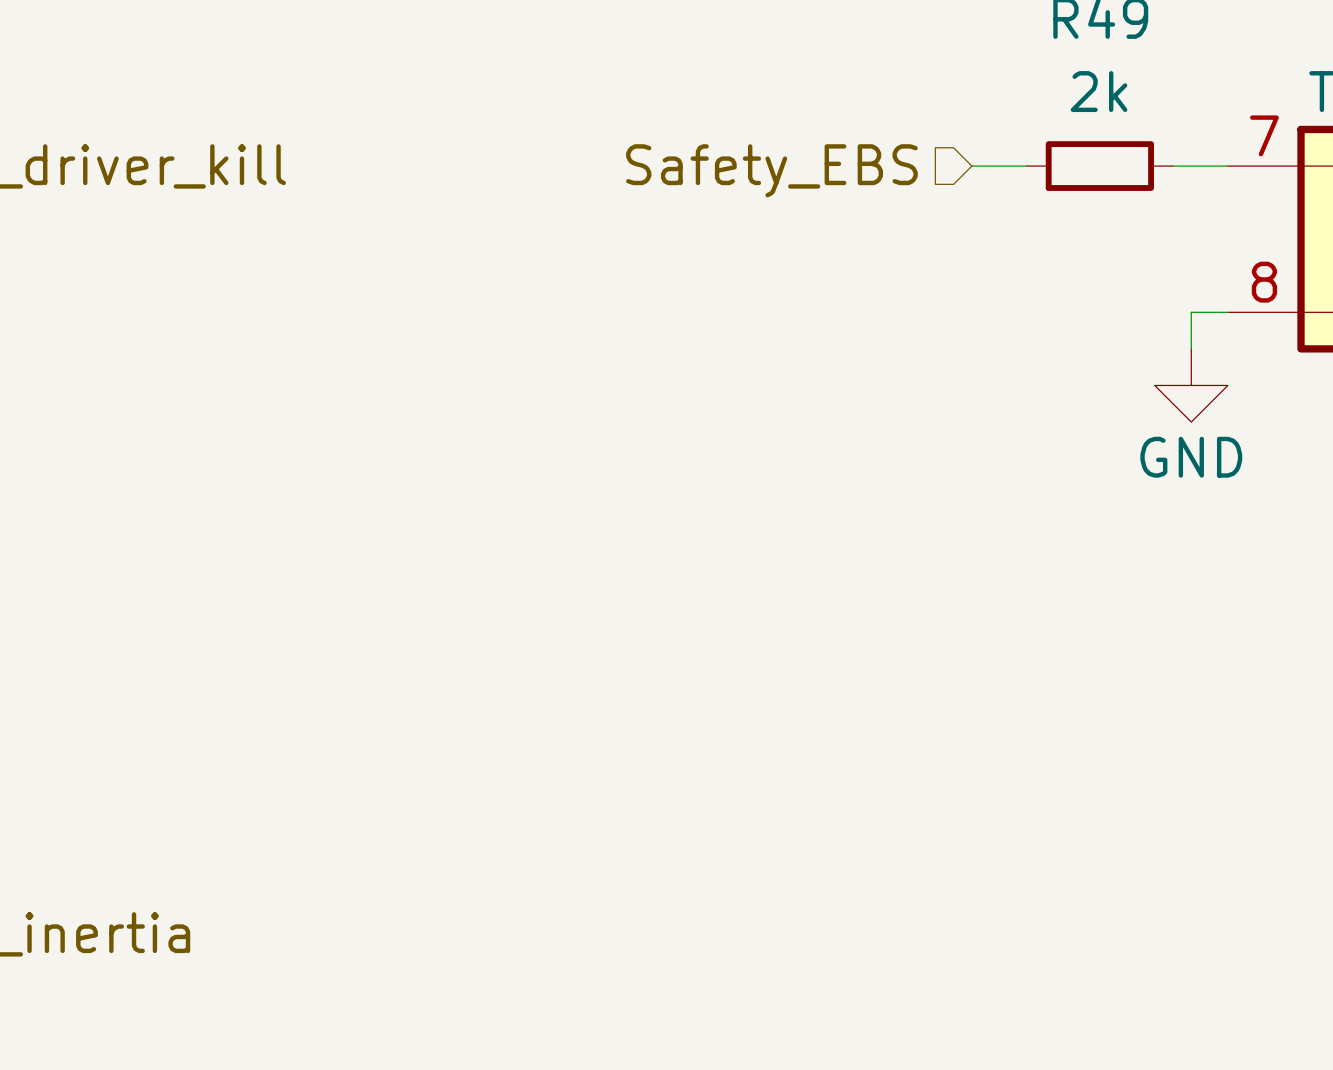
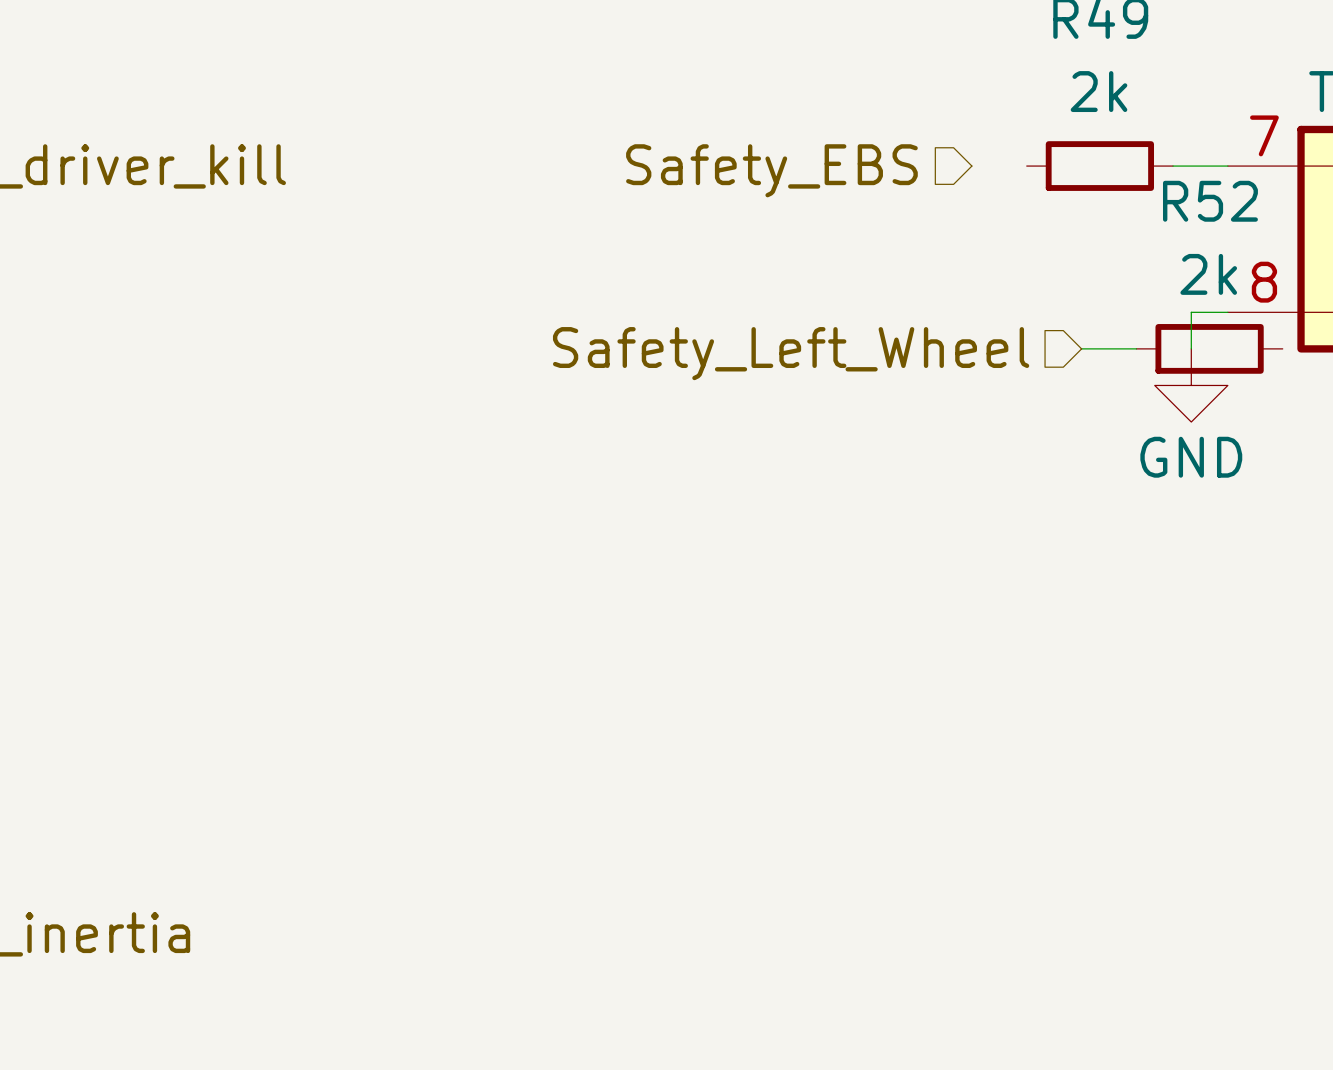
wire: (971, 166) (1026, 166) -> (1081, 348) (1136, 348)
R52: none -> 2k (1209, 348)
hierarchical label: none -> Safety_Left_Wheel (791, 353)

